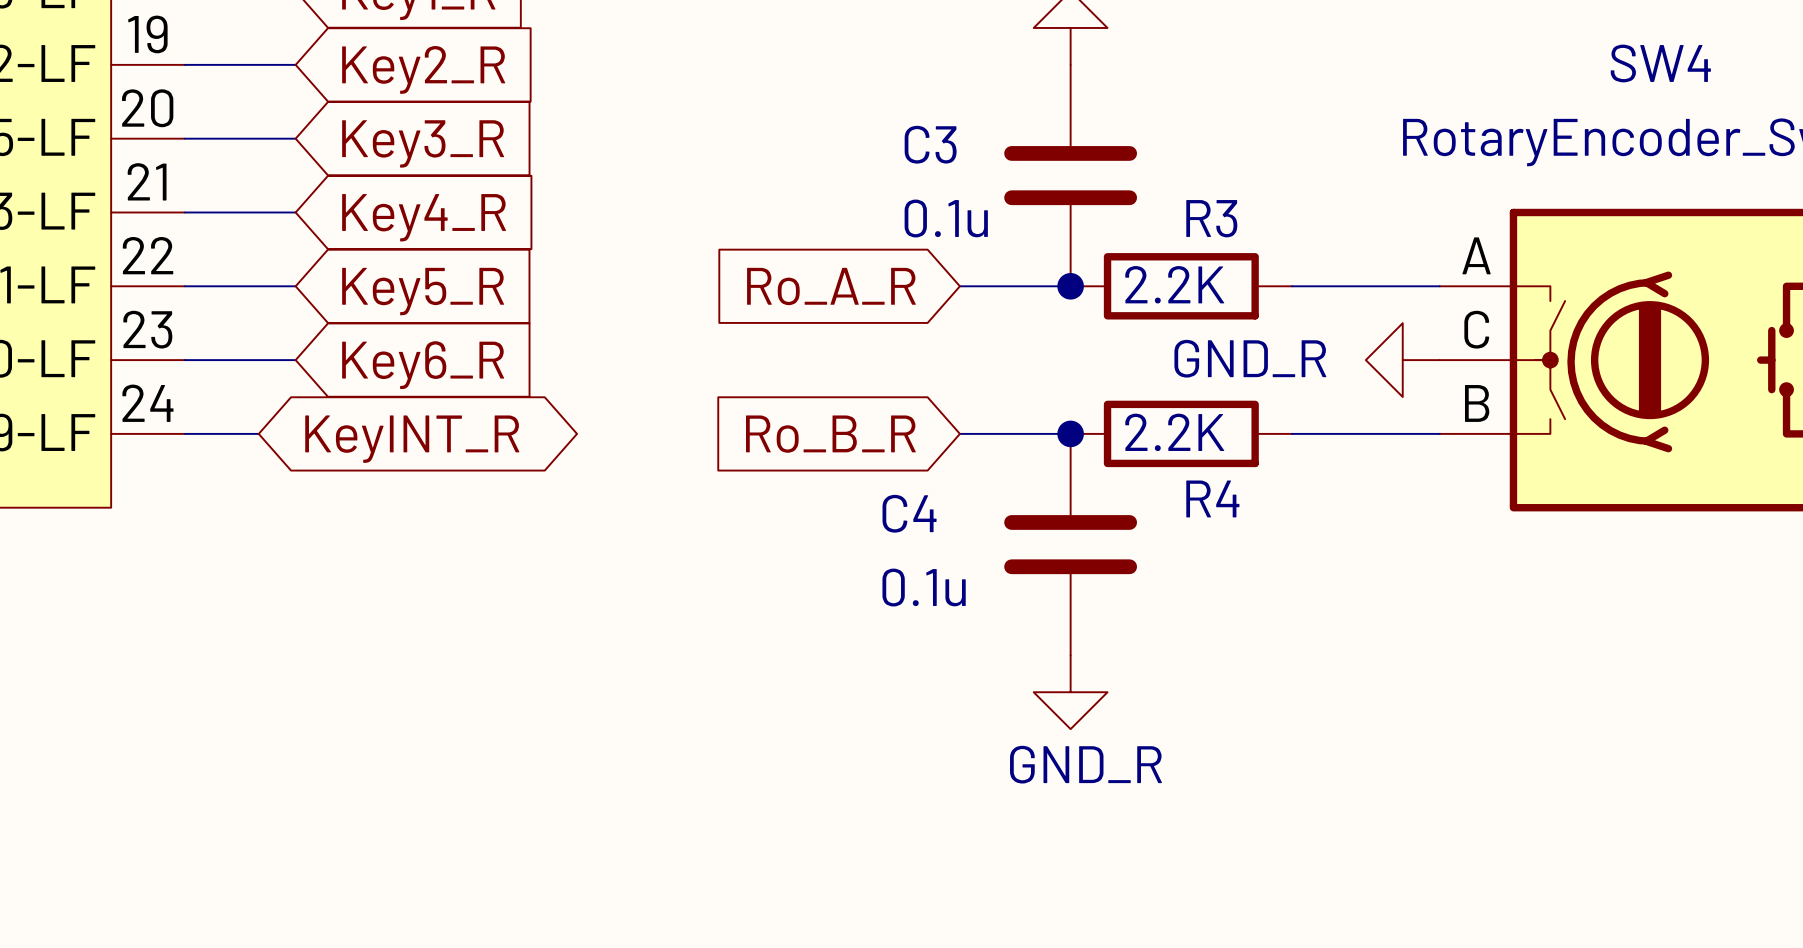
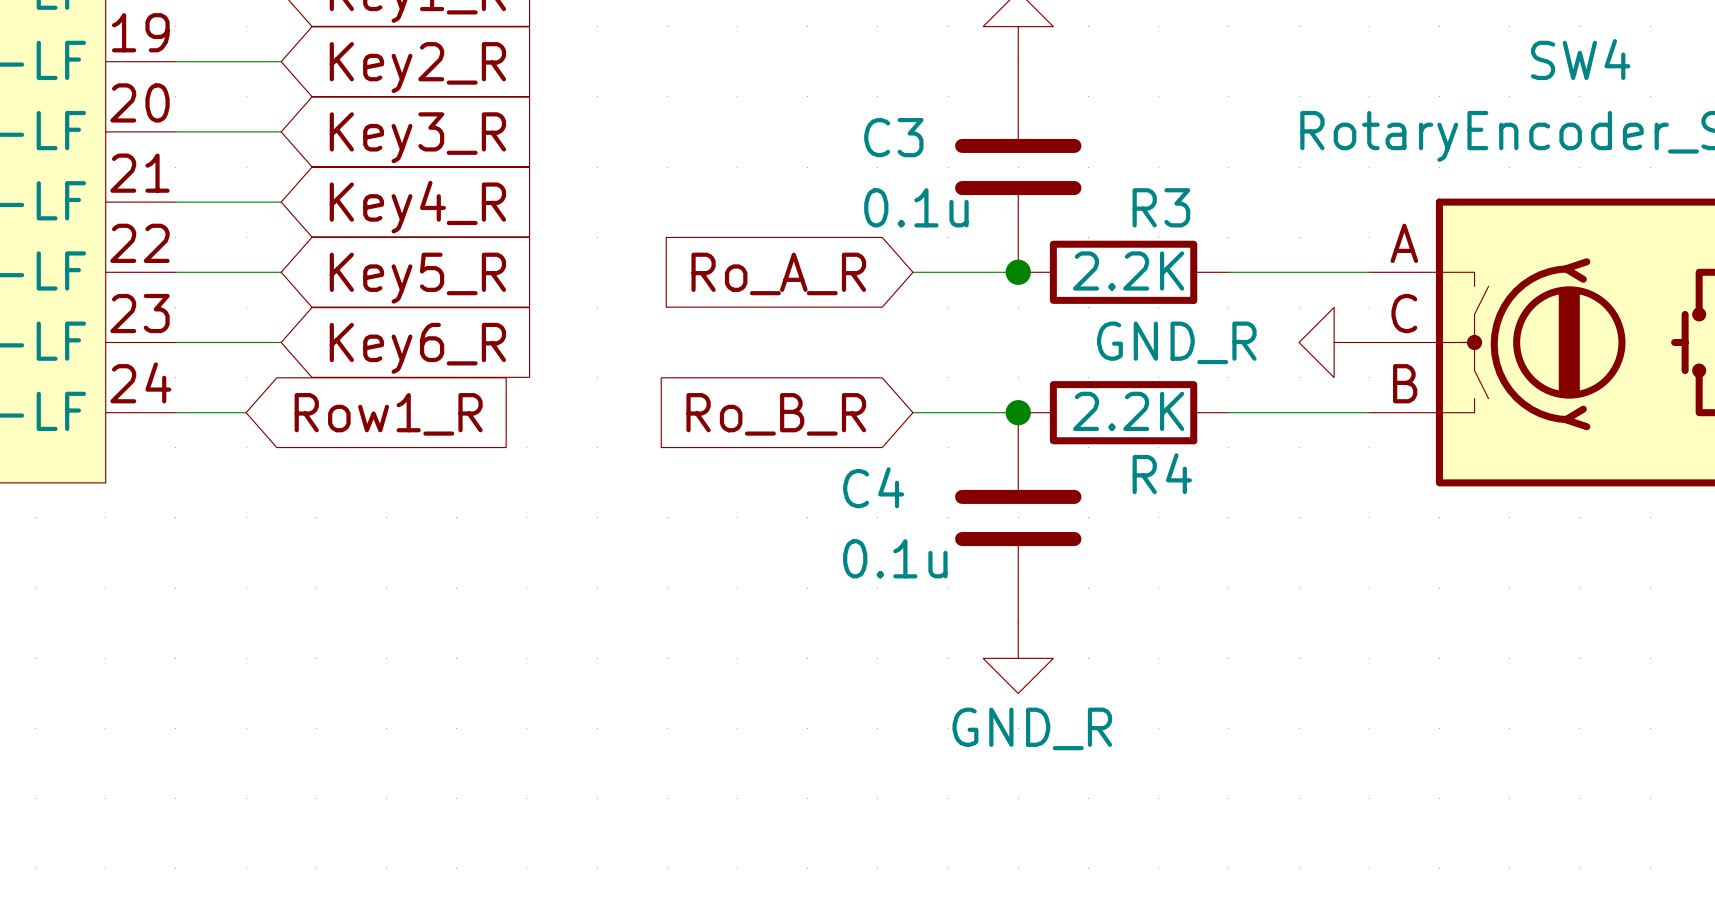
global label shape: bidirectional (412, 439) -> input (388, 414)
global label: KeyINT_R (412, 439) -> Row1_R (388, 414)

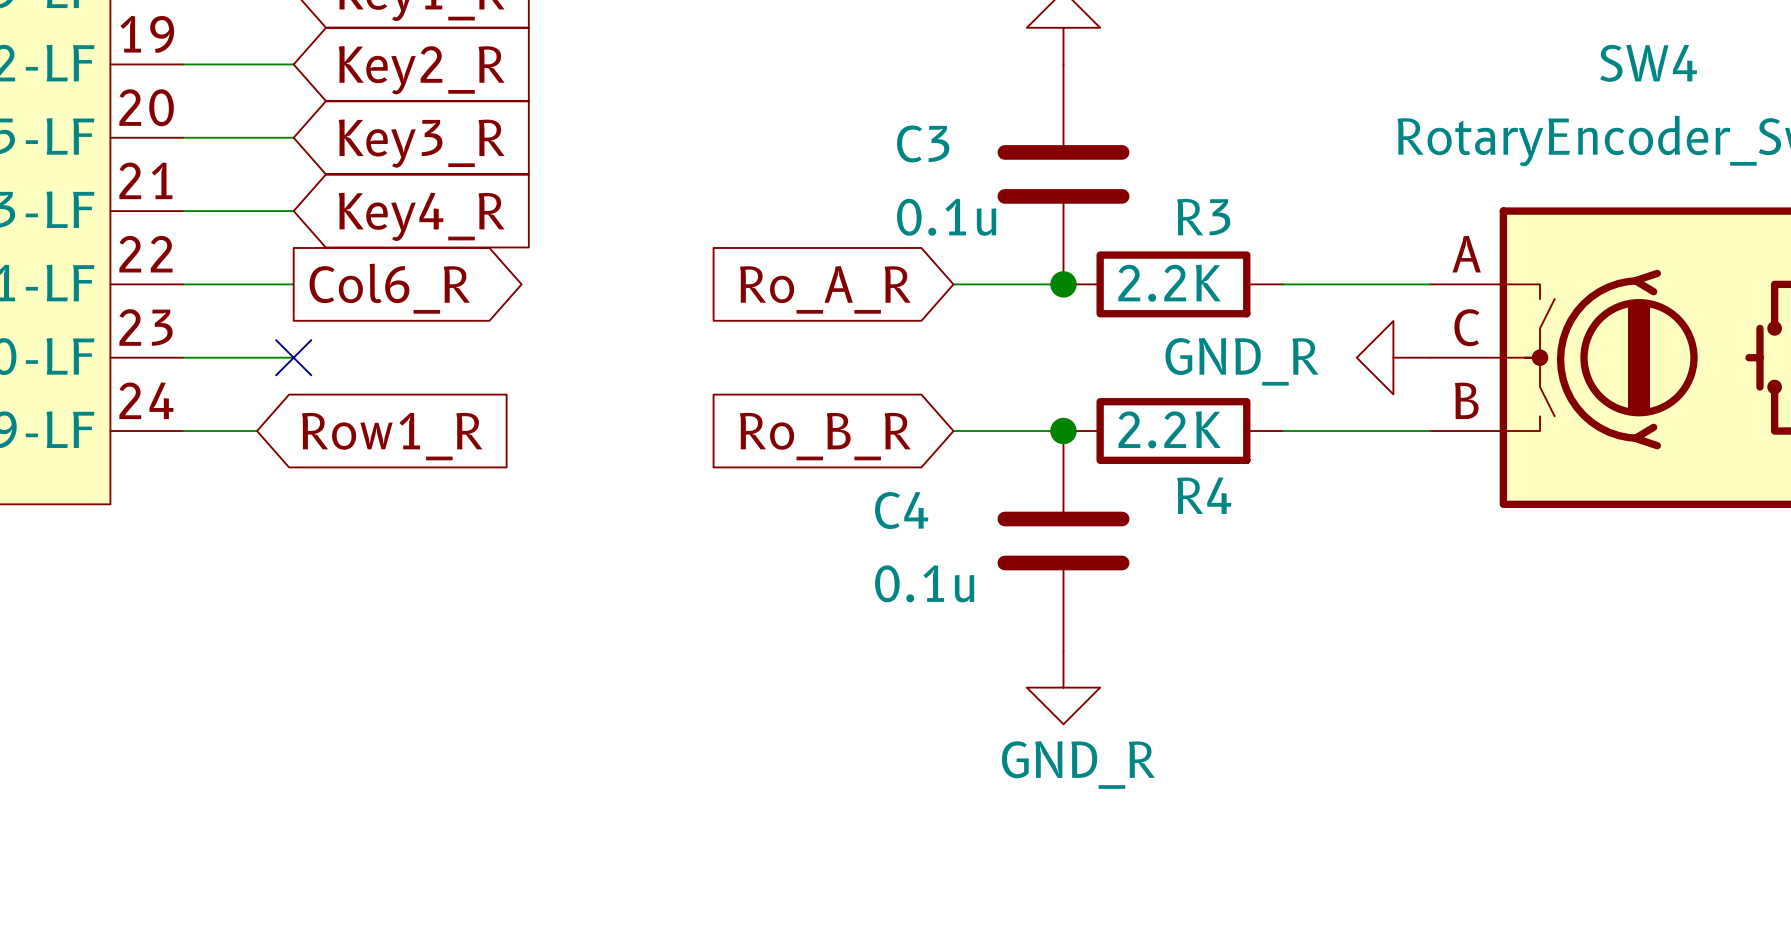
global label shape: input (417, 278) -> output (389, 288)
global label: Key5_R (417, 278) -> Col6_R (389, 288)
no-connect mark: none -> (293, 357)
global label: Key6_R (417, 348) -> none

